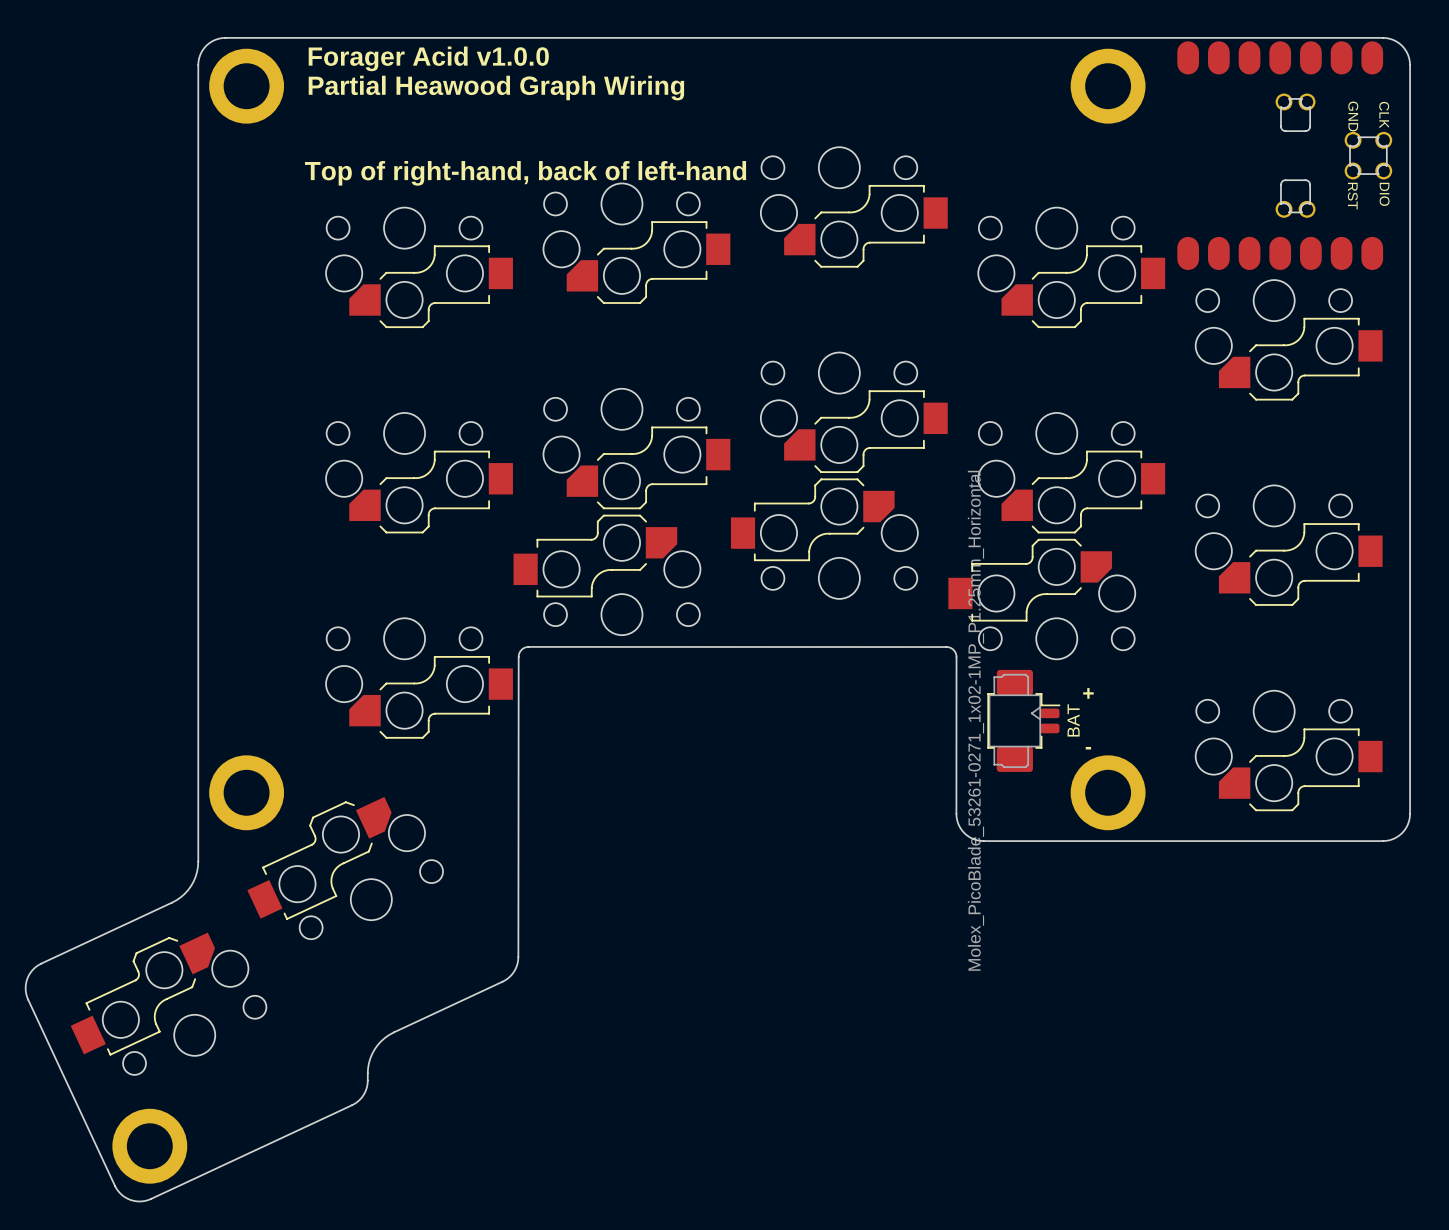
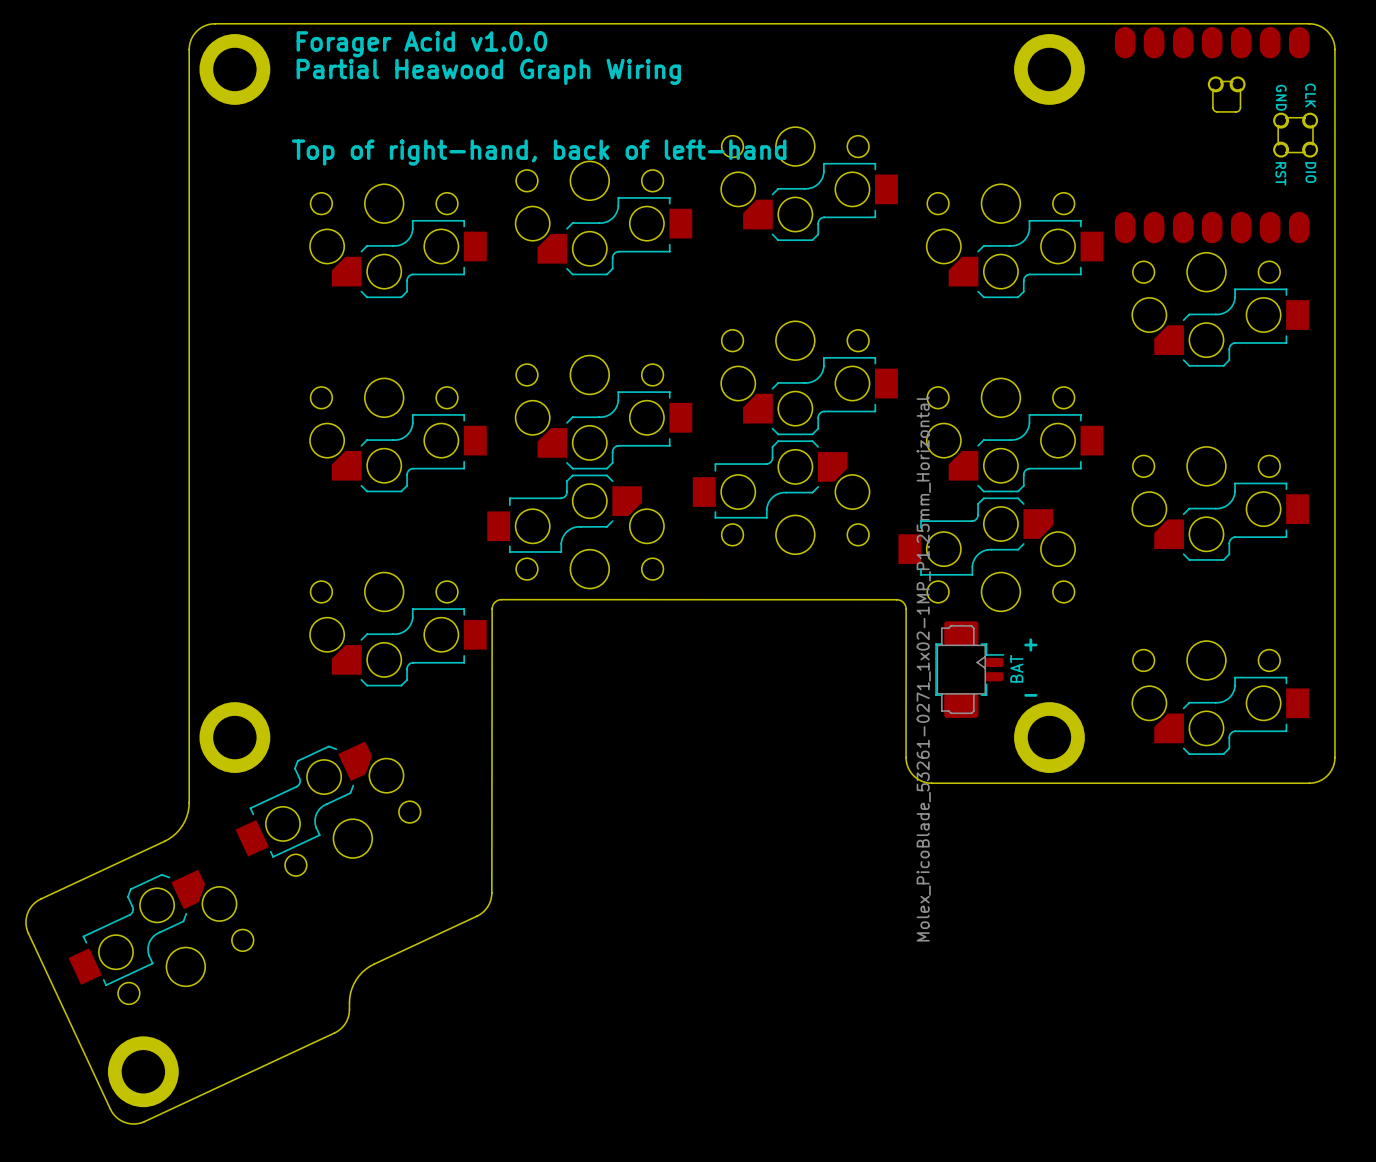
part: (1295, 198) -> none

